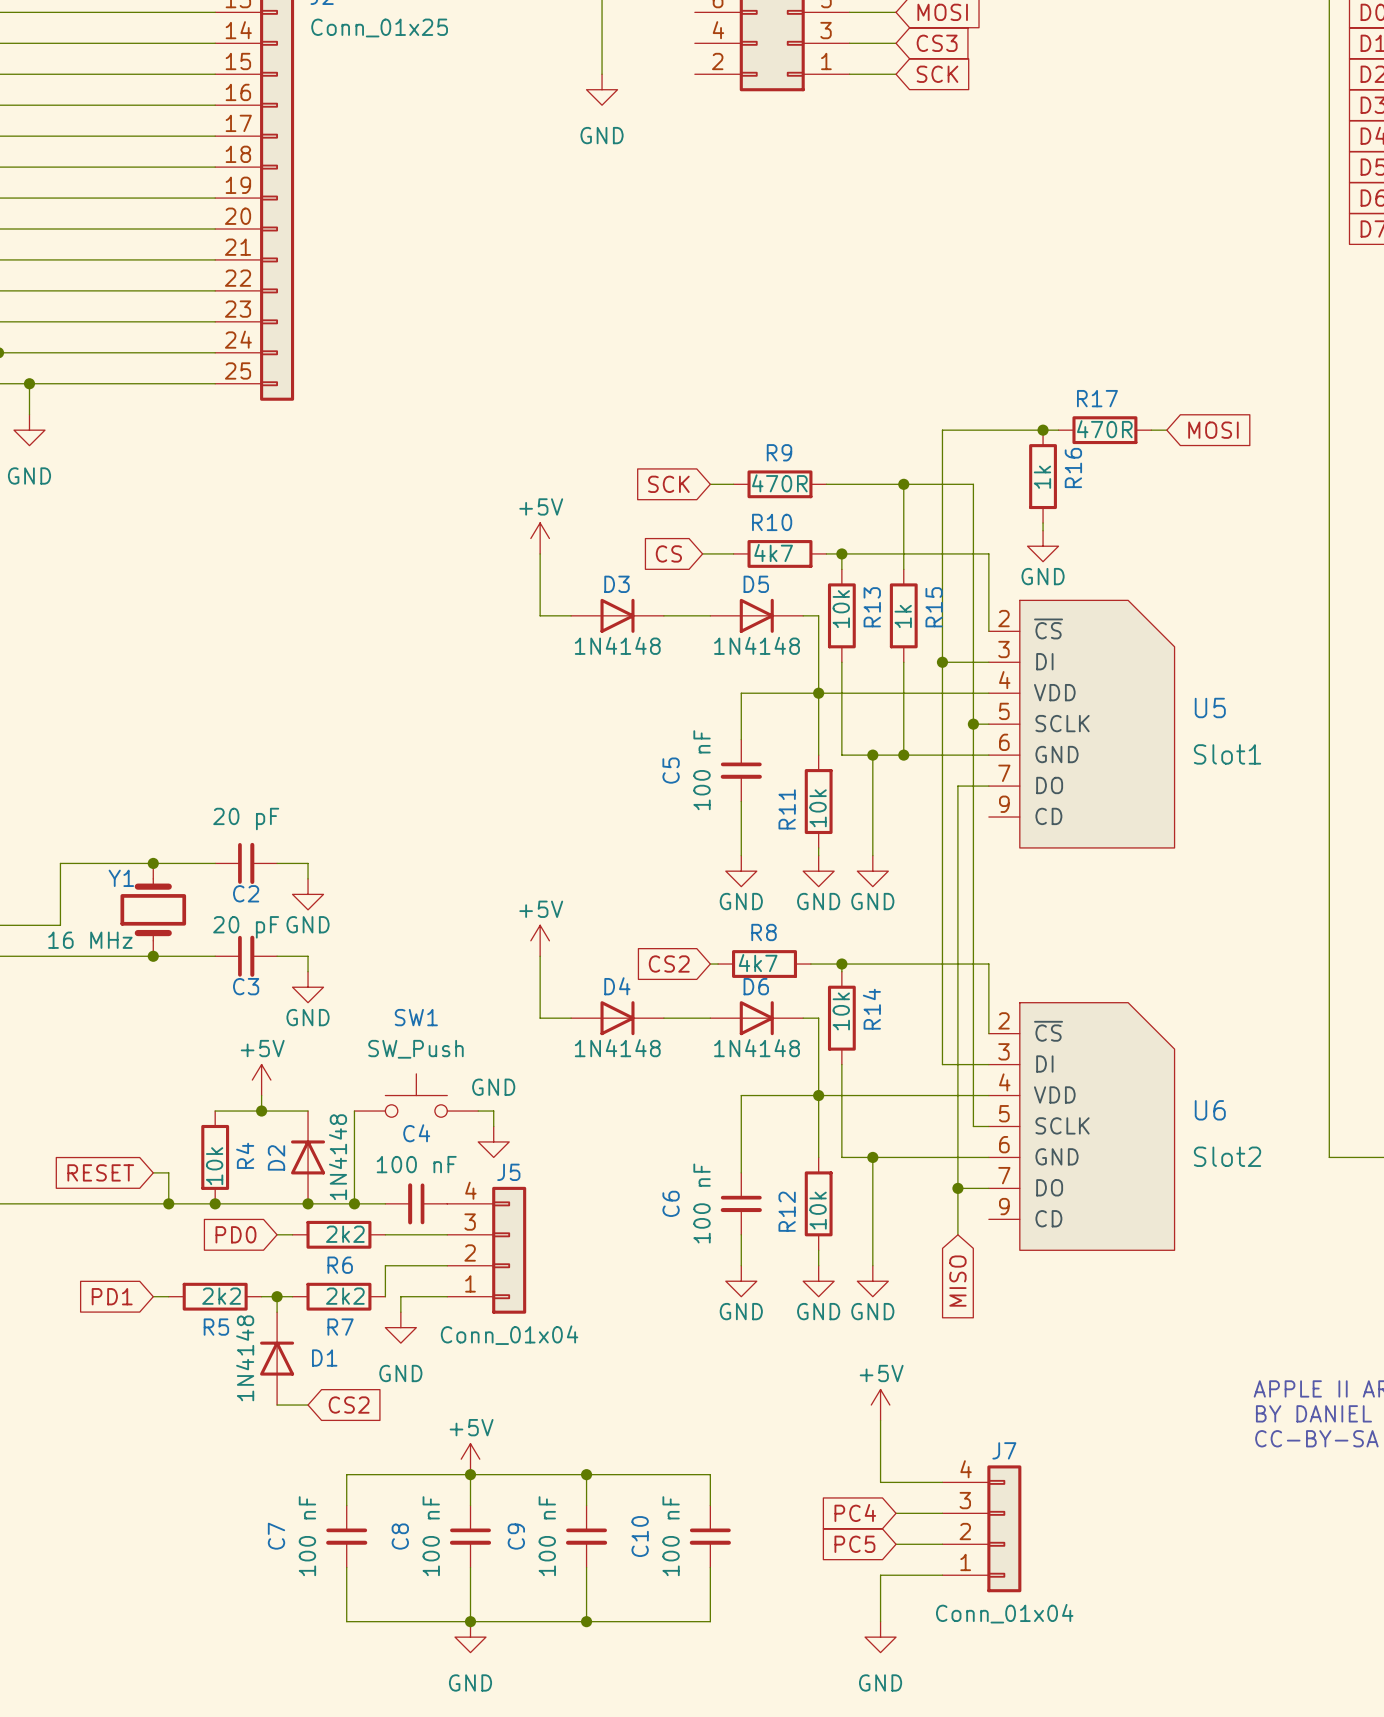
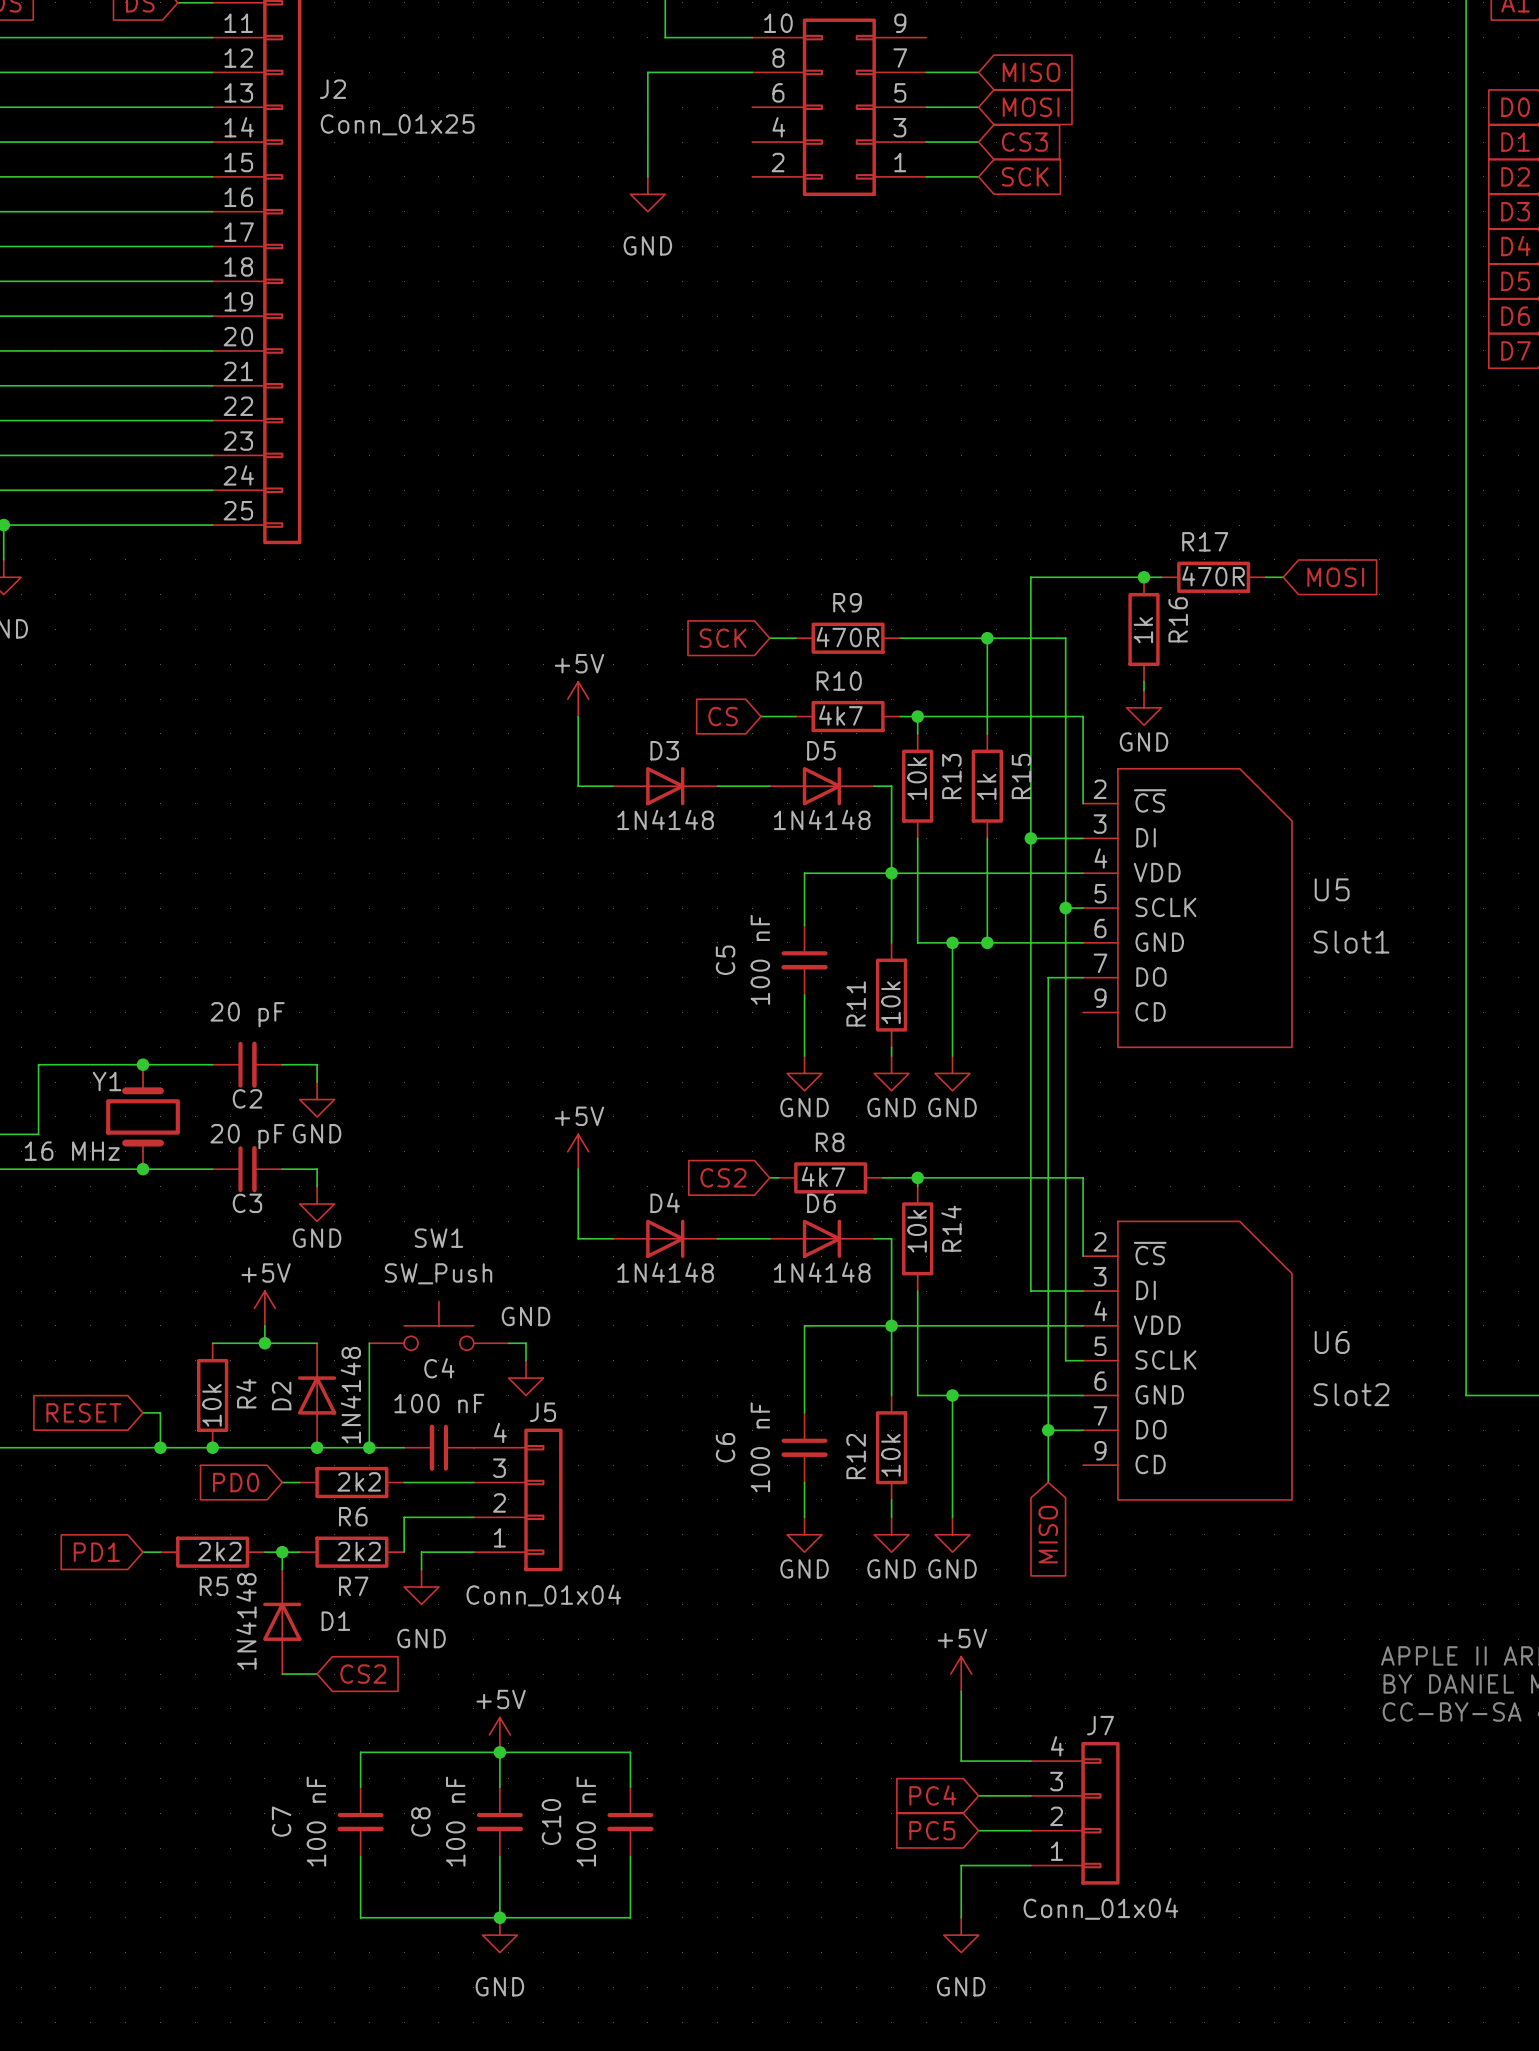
wire: (586, 1474) (710, 1474) (710, 1505) -> none
junction: (586, 1474) -> none
C9 name: C9 (516, 1536) -> C10 (551, 1822)
C10: 100 nF (710, 1536) -> none
wire: (710, 1567) (710, 1621) (586, 1621) -> none
junction: (586, 1621) -> none

